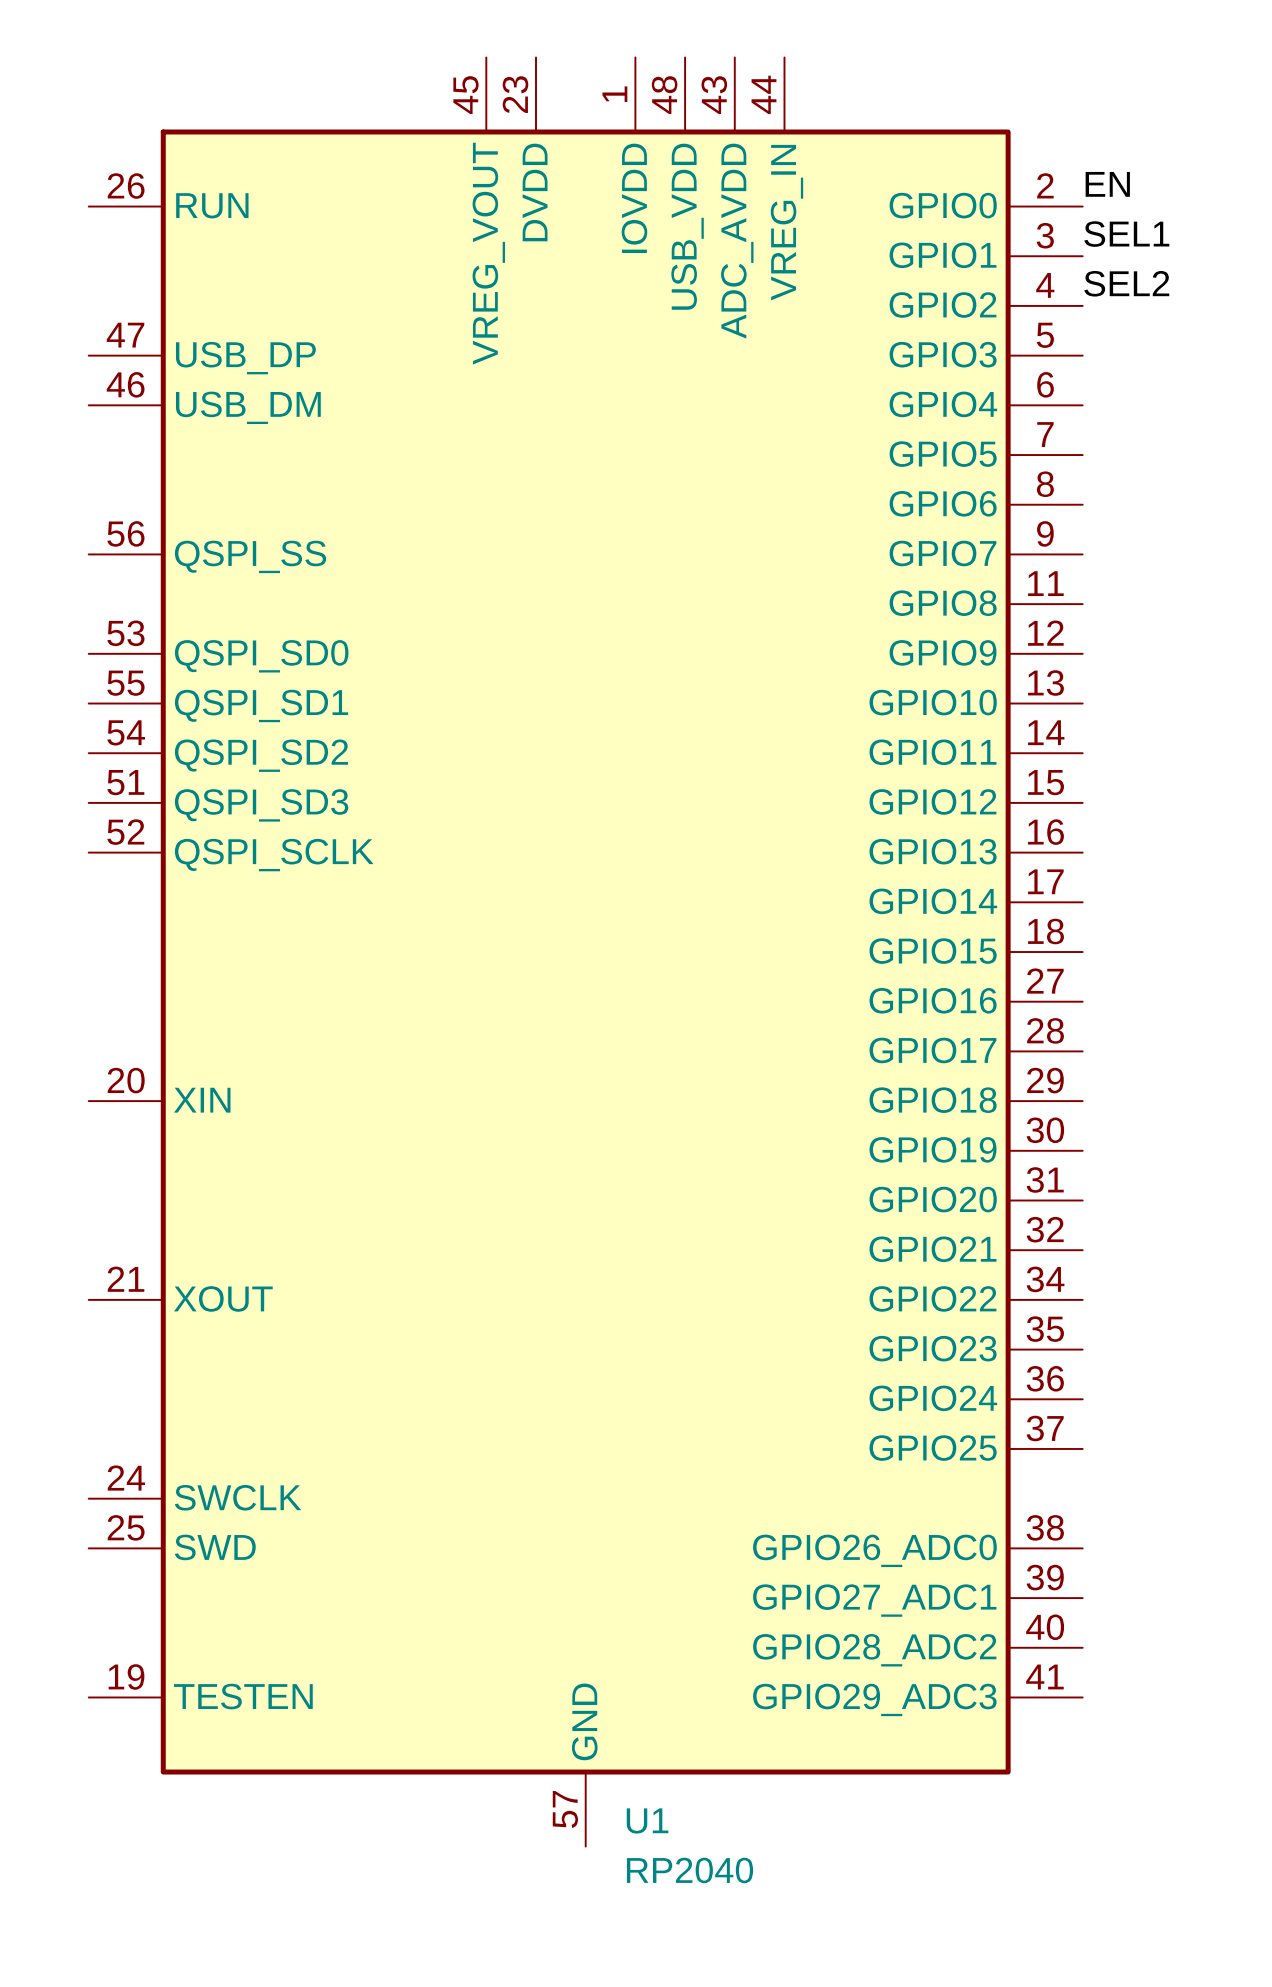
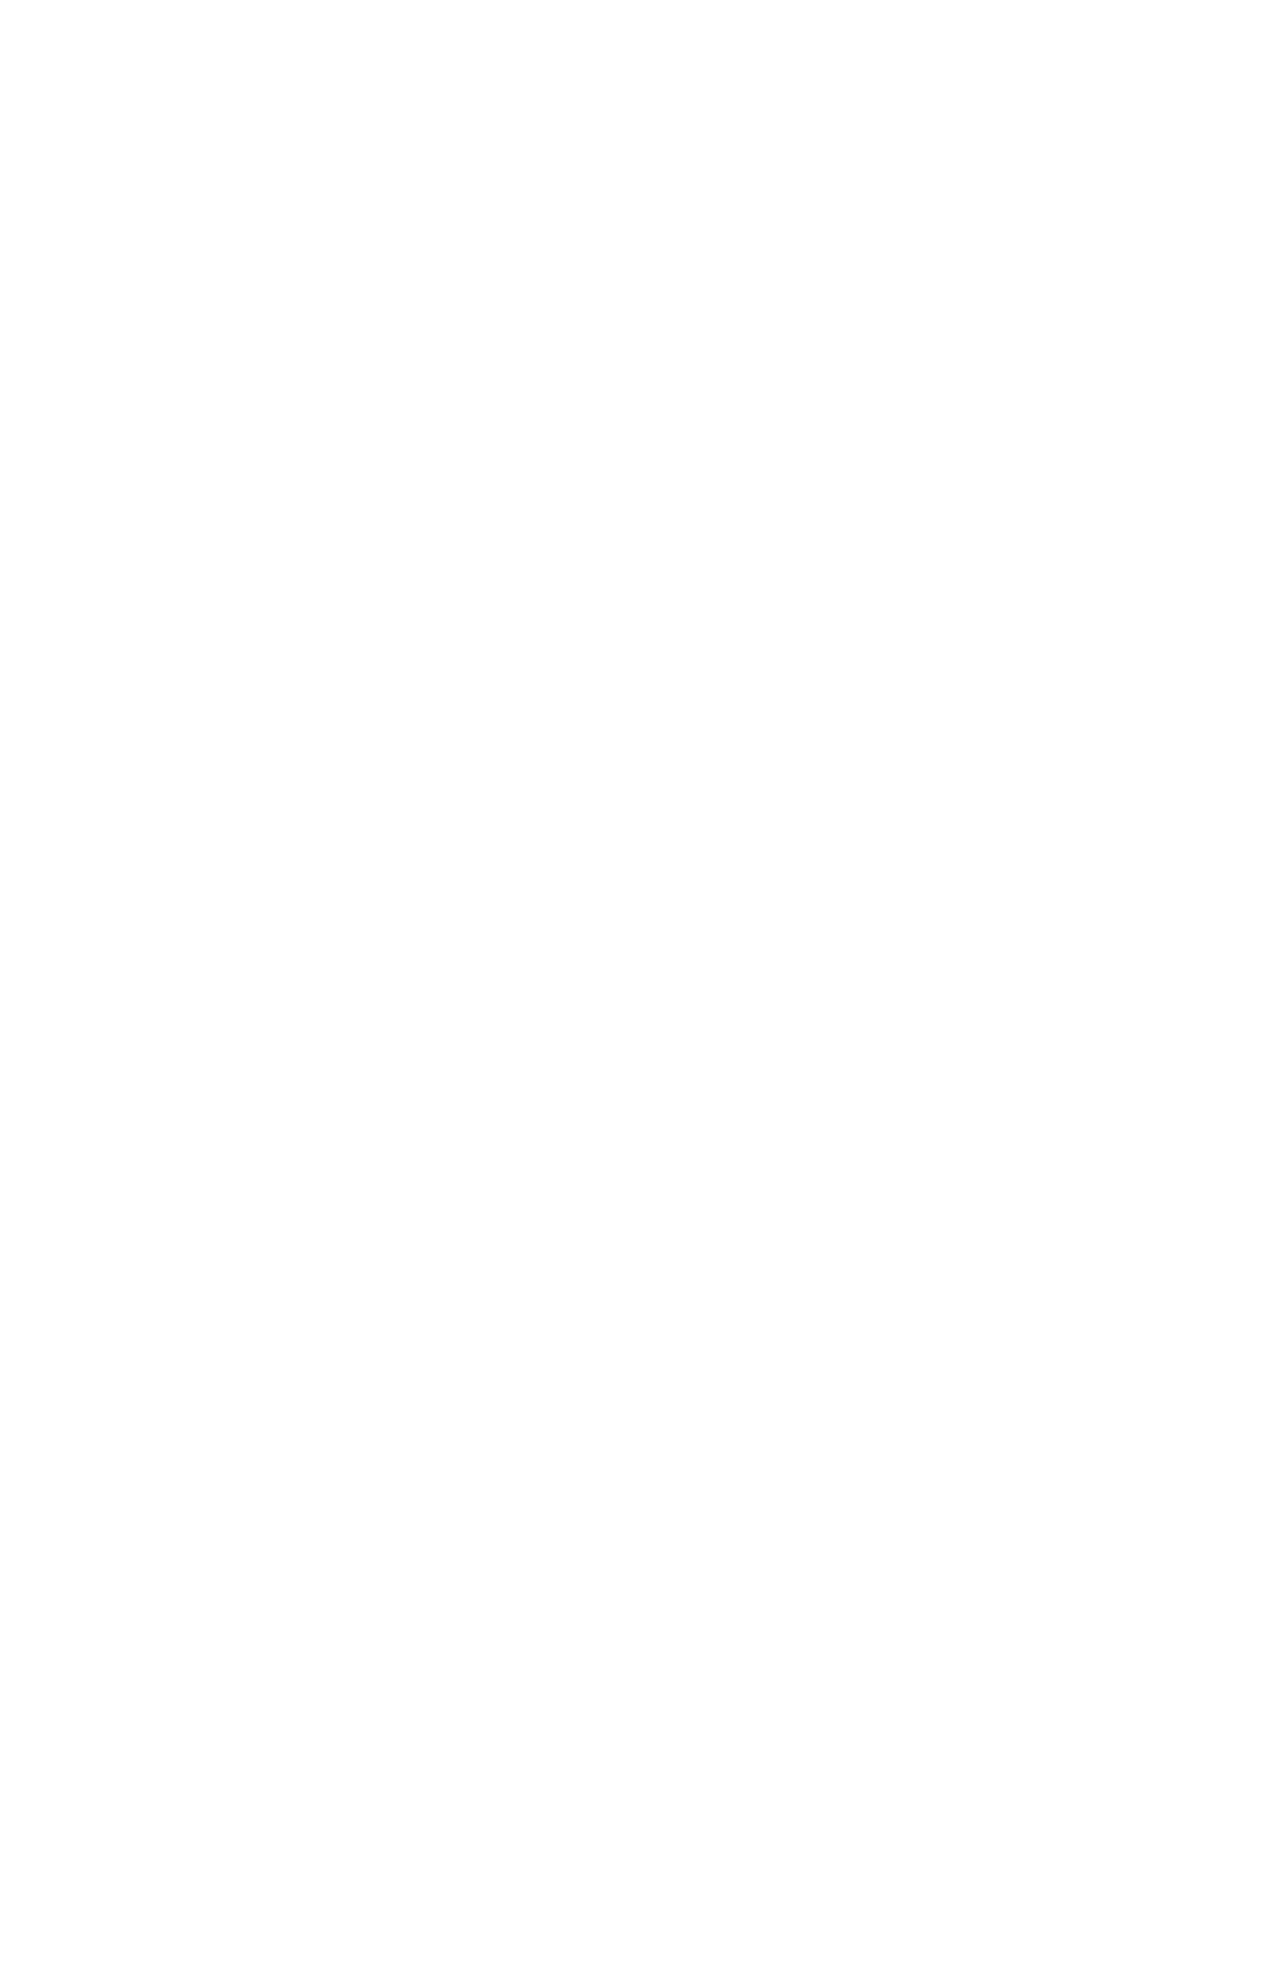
label: EN (1107, 184) -> none
label: SEL1 (1126, 234) -> none
label: SEL2 (1126, 283) -> none
U1: RP2040 (585, 952) -> none

